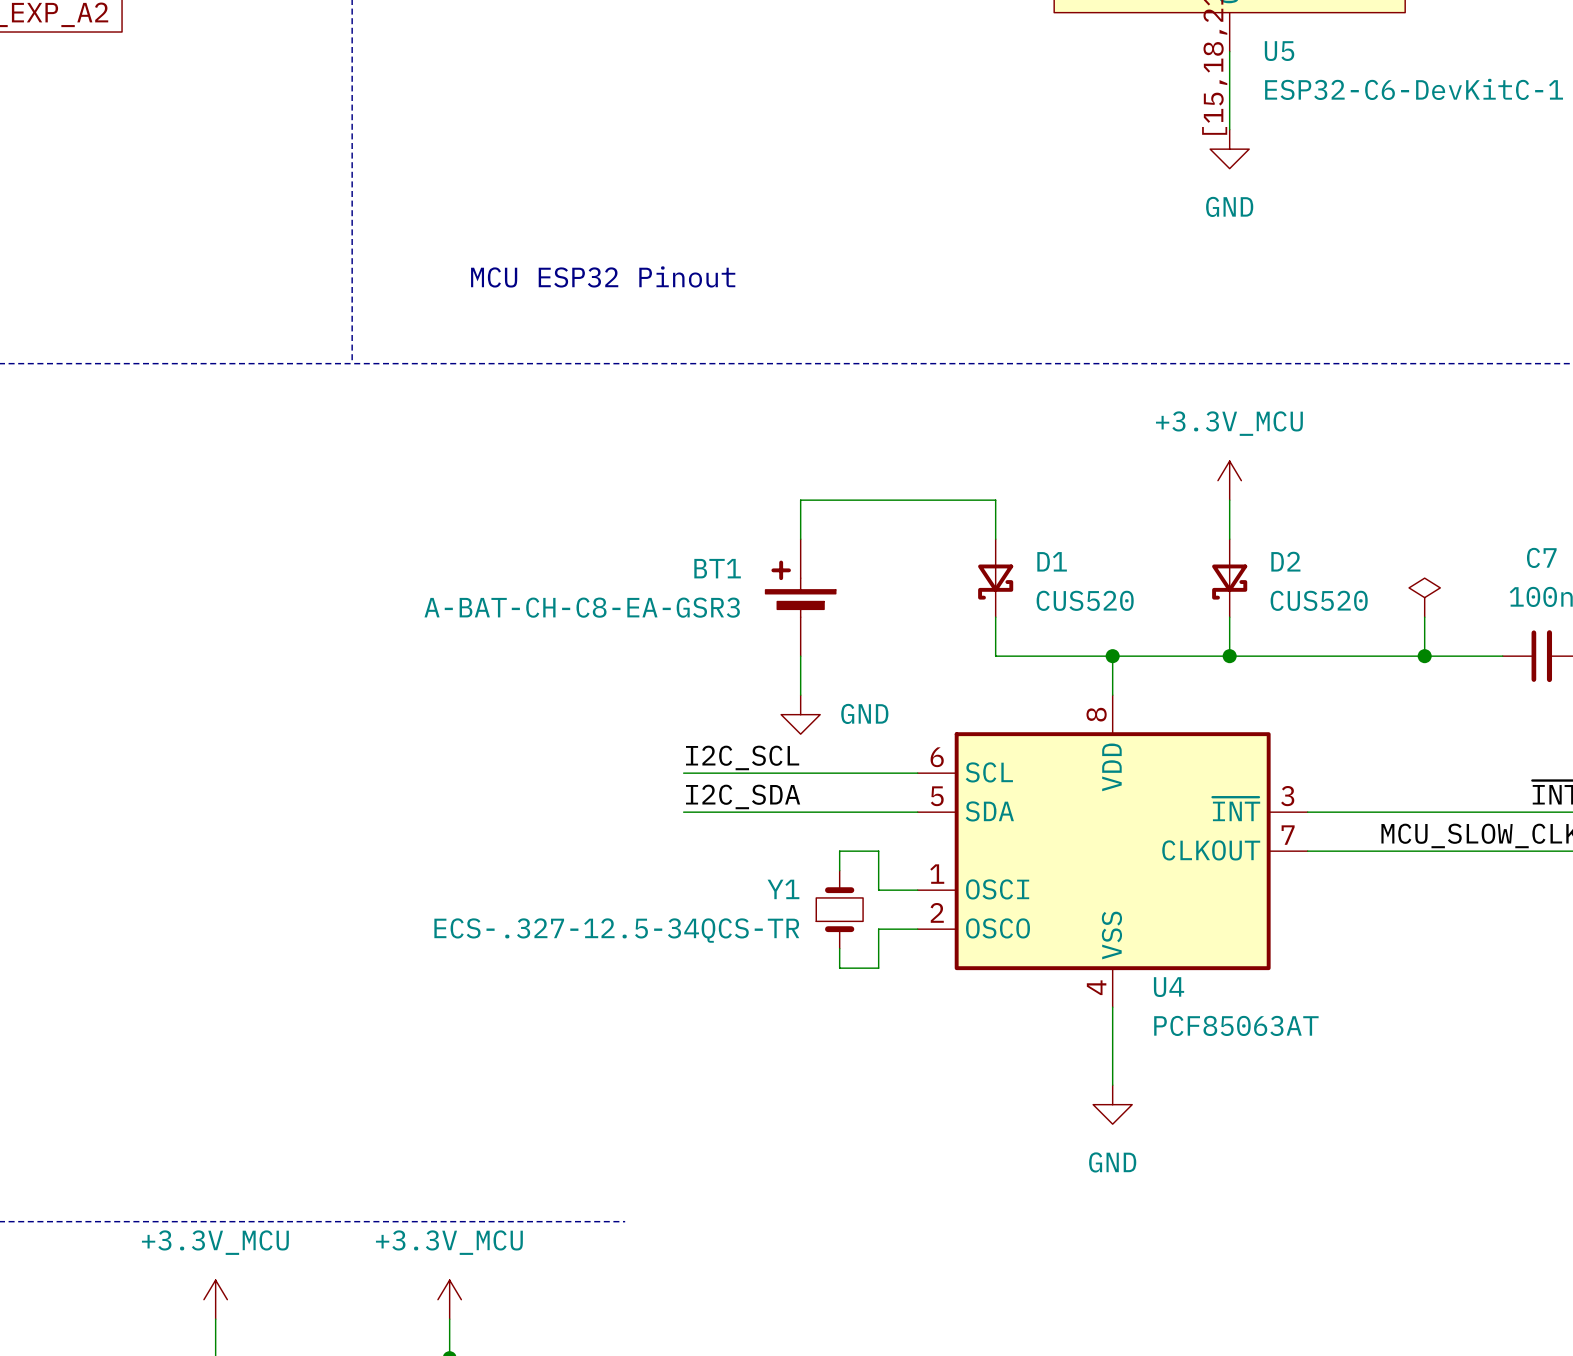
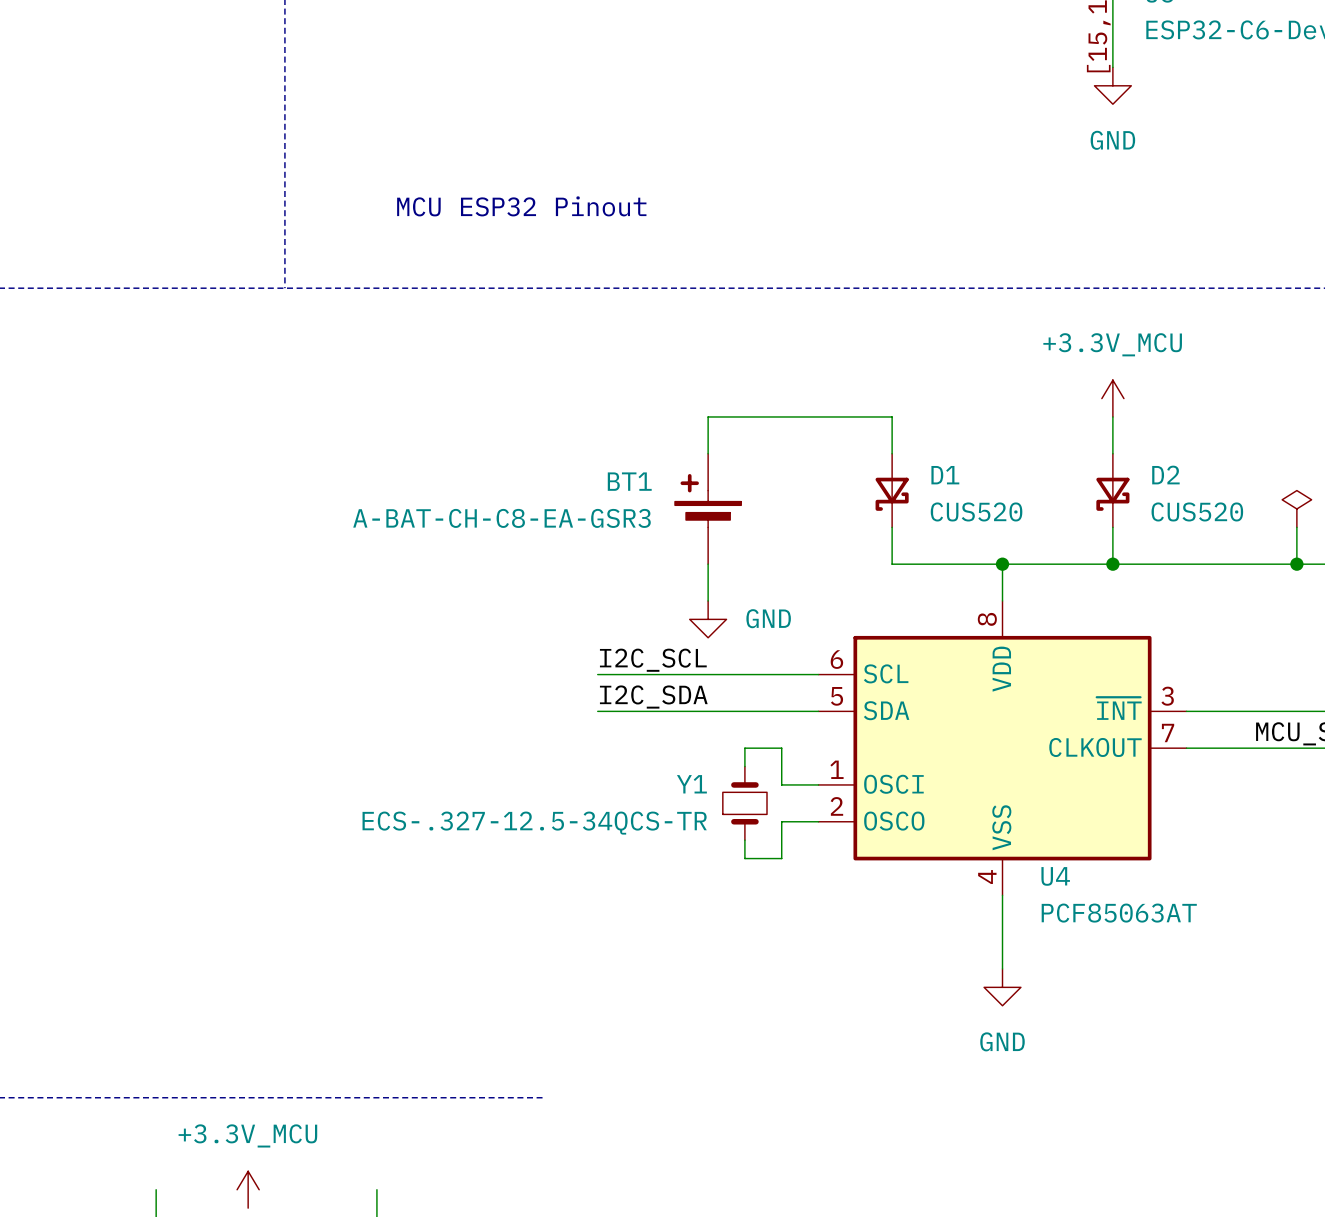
power symbol: +3.3V_MCU (215, 1299) -> none
power symbol: +3.3V_MCU (449, 1299) -> none
power symbol: none -> +3.3V_MCU (248, 1189)

